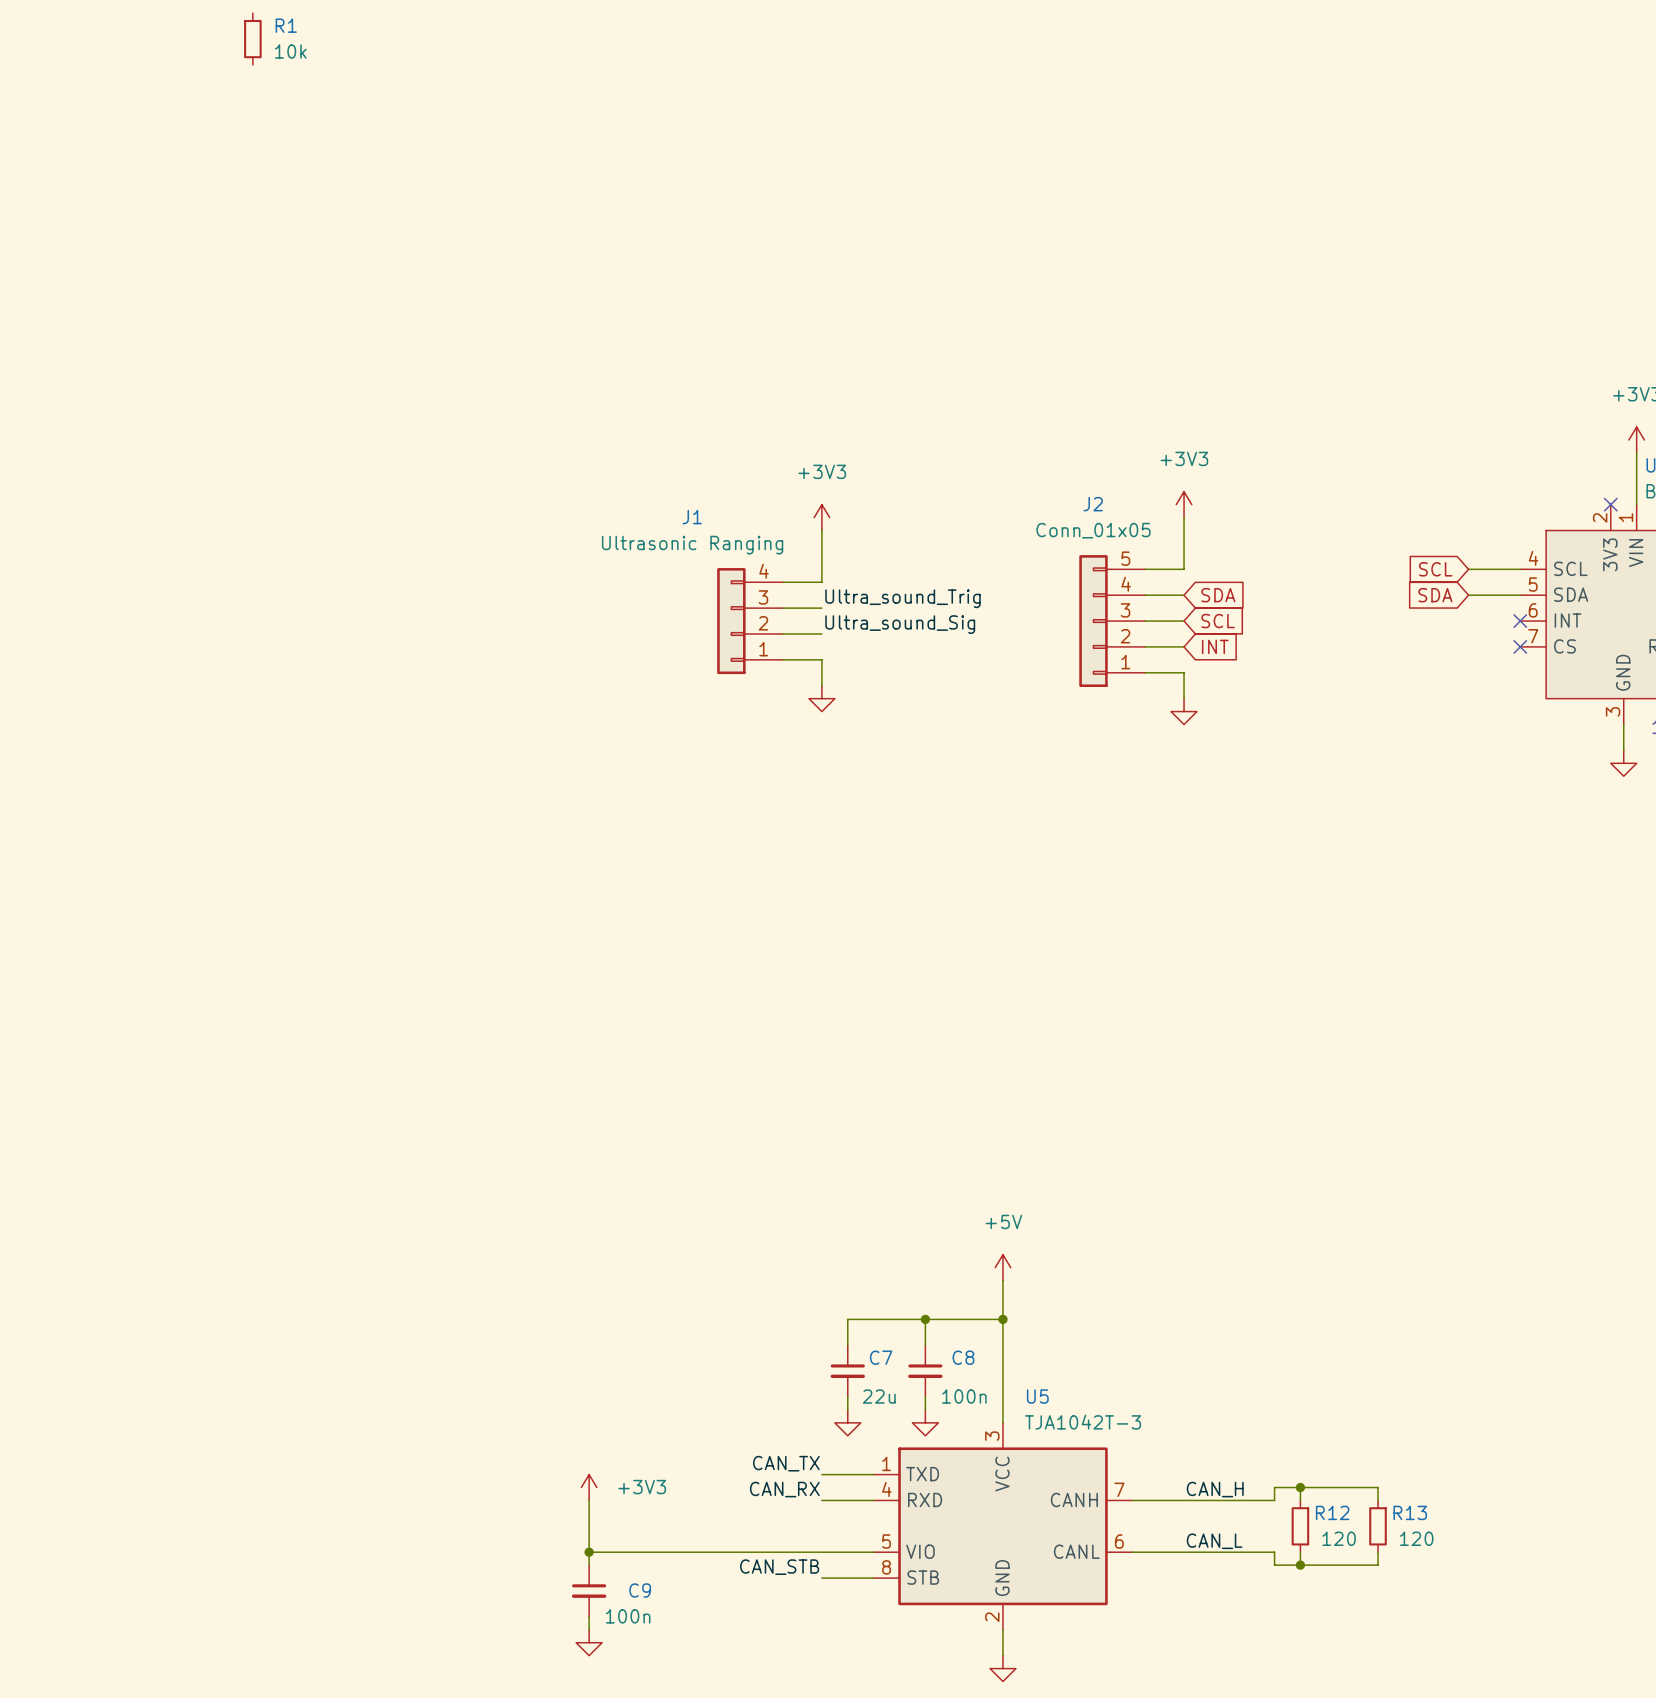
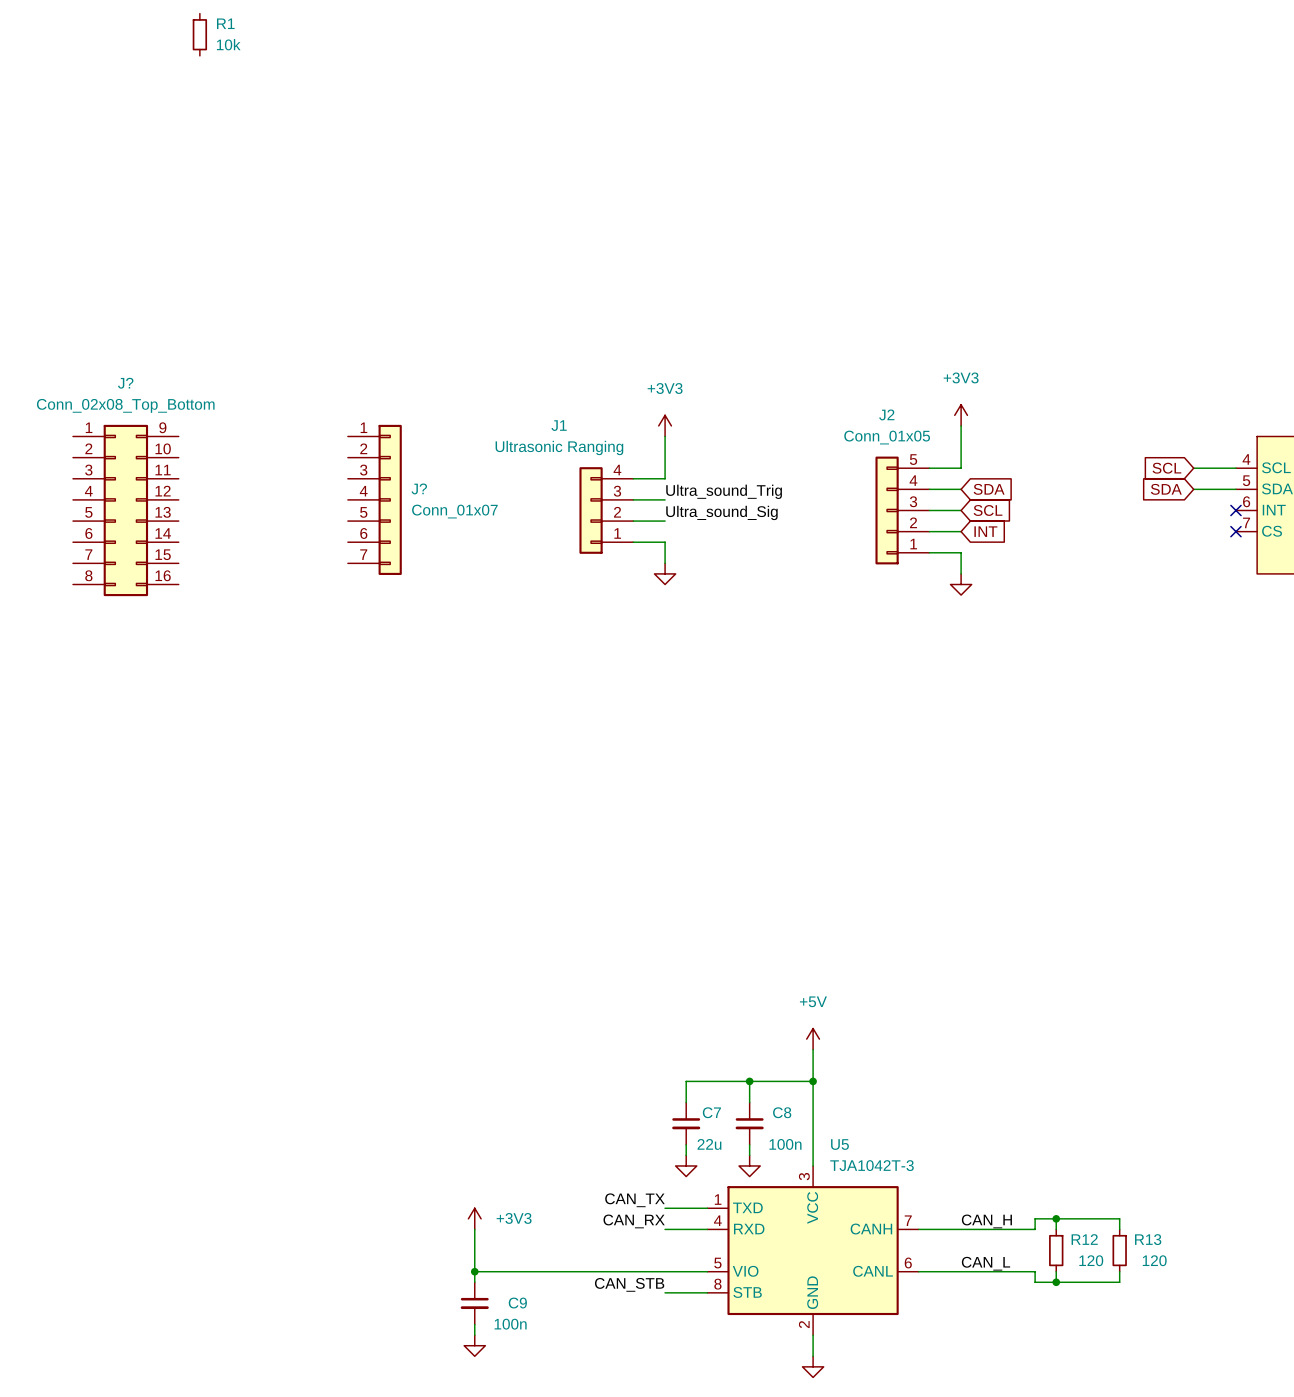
J?: none -> Conn_01x07 (374, 499)
J?: none -> Conn_02x08_Top_Bottom (125, 510)

